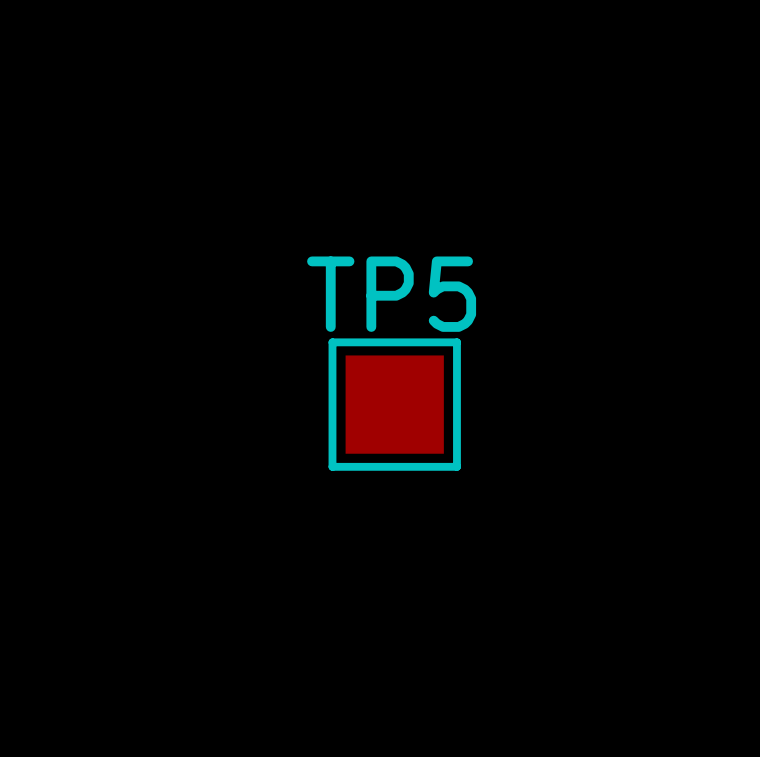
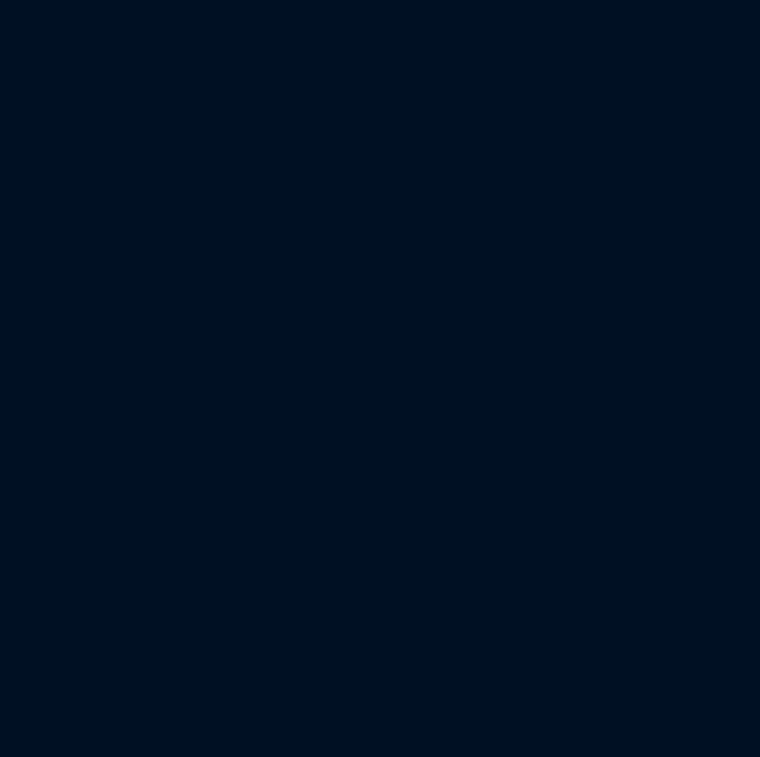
TP5: (394, 404) -> none

